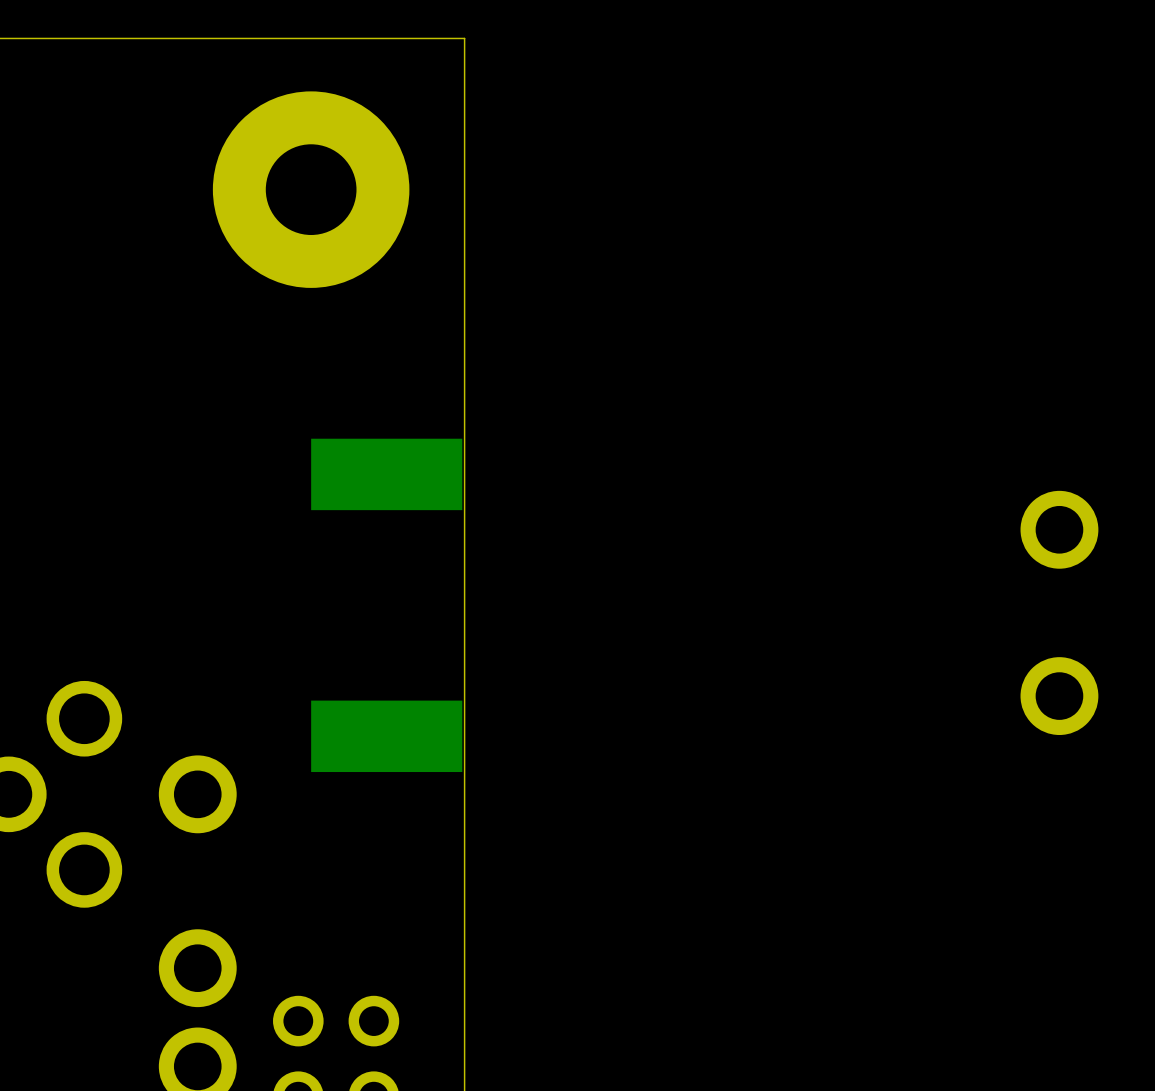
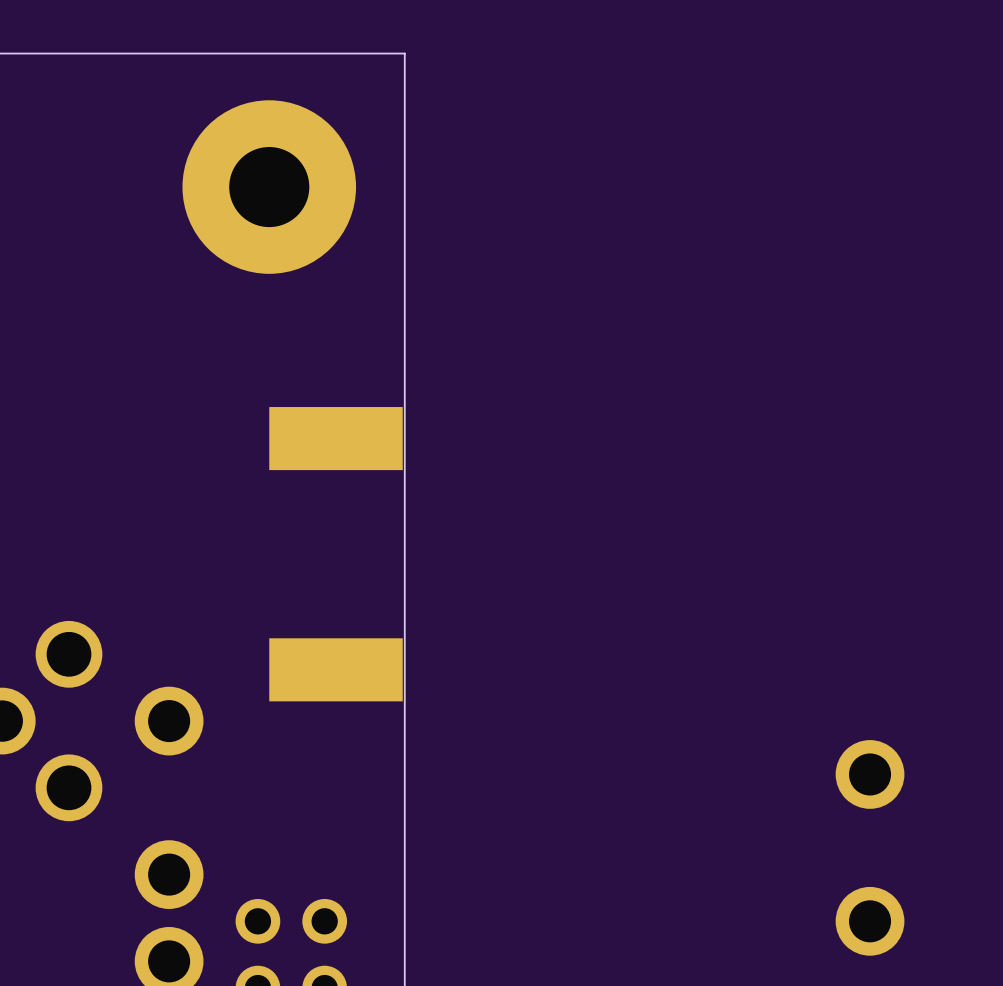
part: (1059, 529) -> none
part: (1059, 696) -> none
part: none -> (870, 774)
part: none -> (870, 921)

